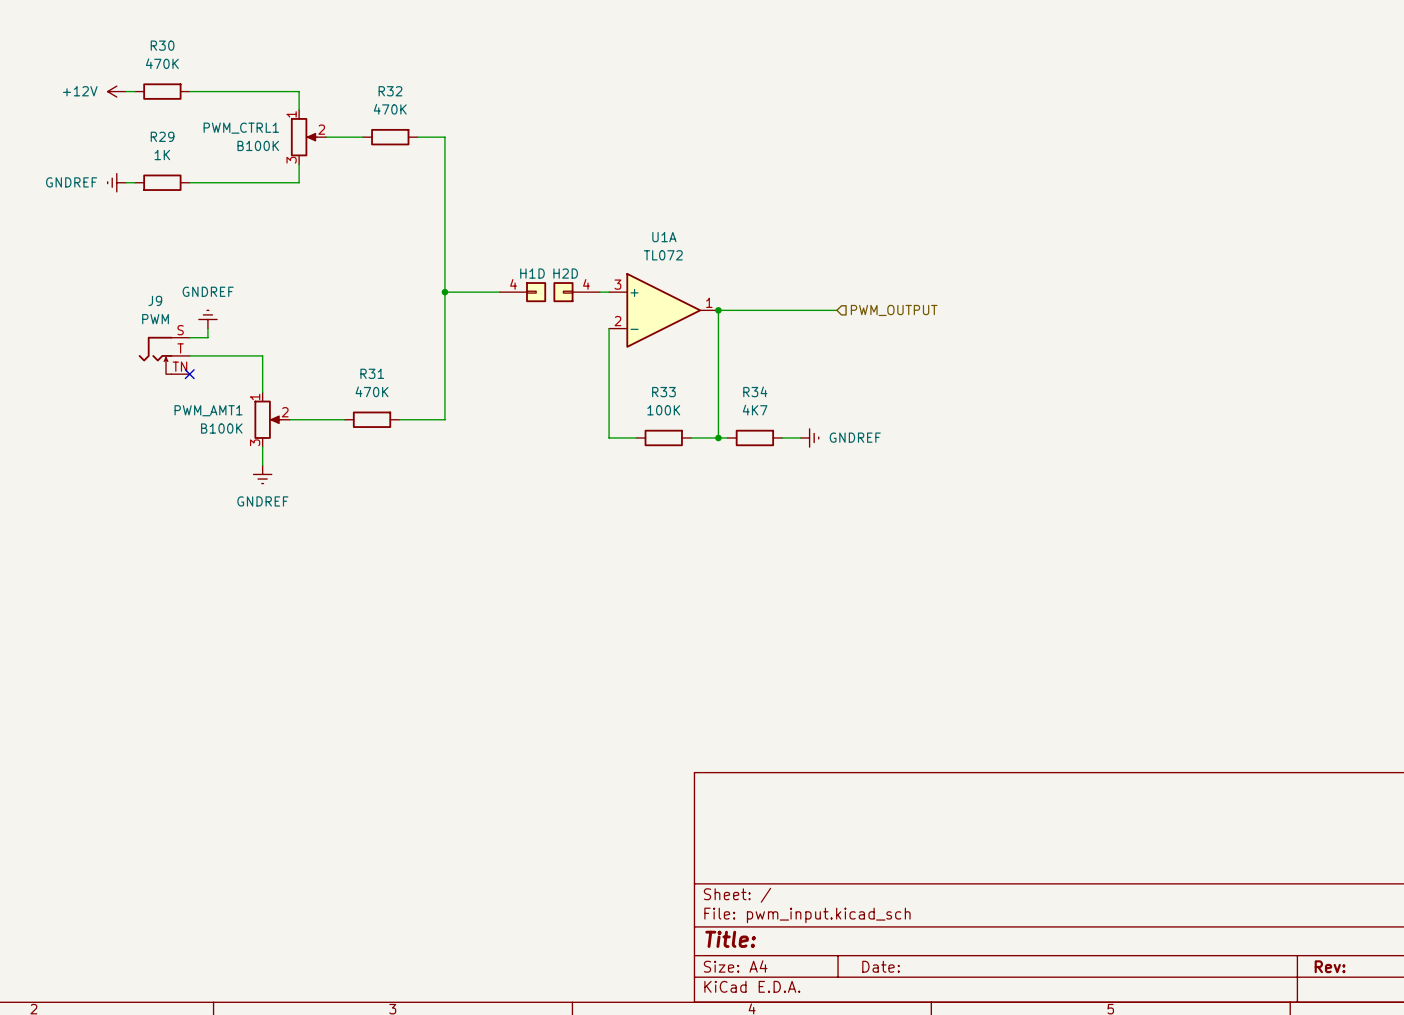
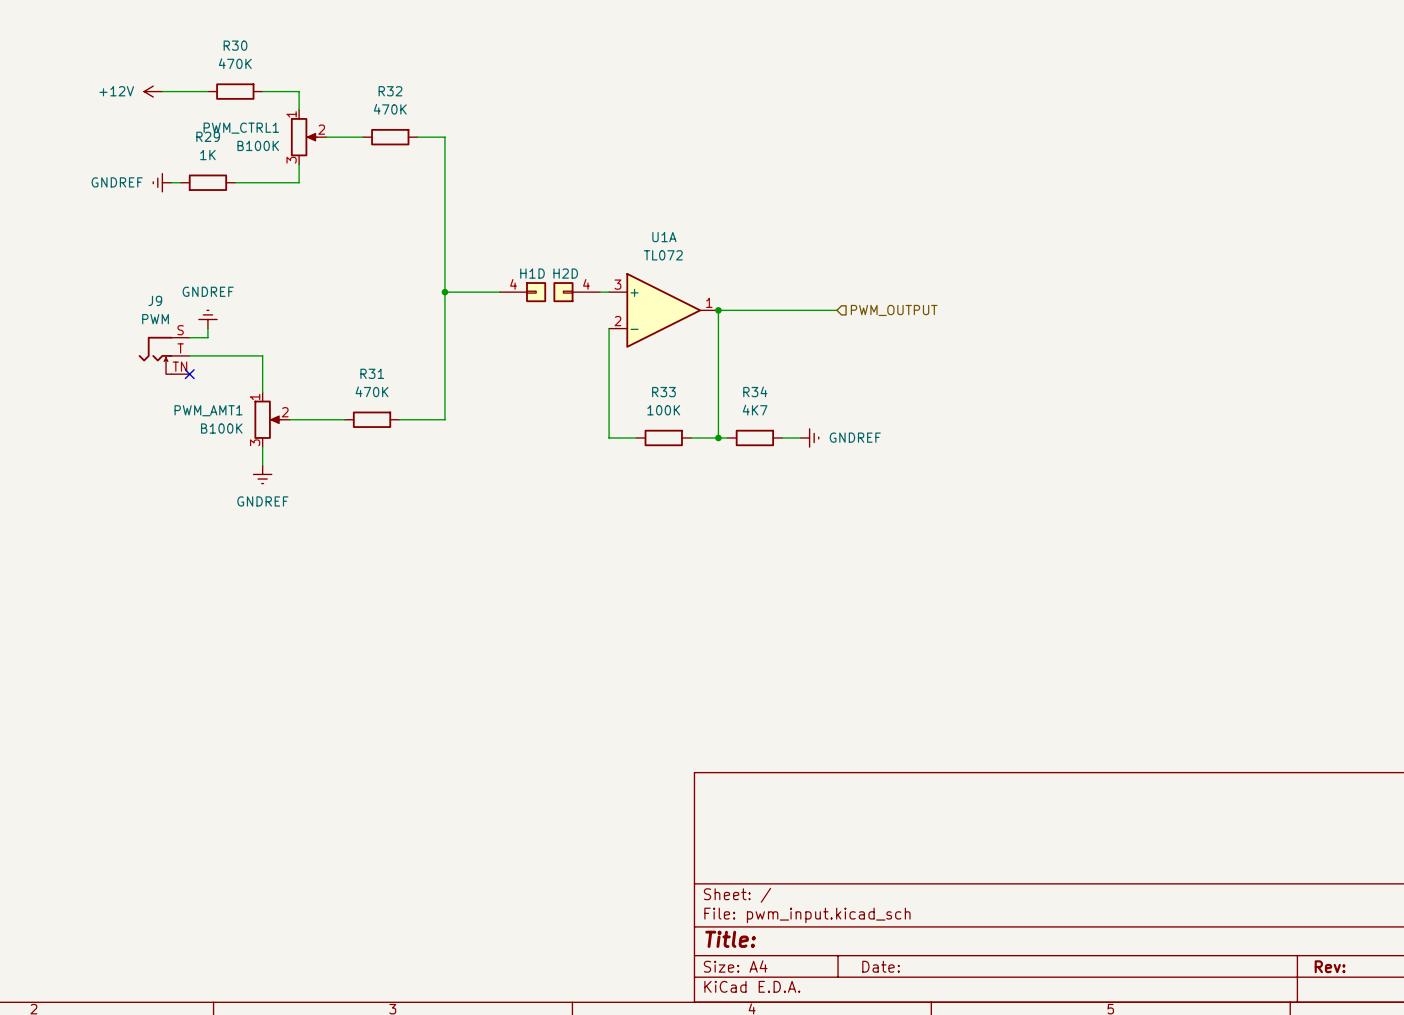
power symbol position: +12V (116, 91) -> +12V (153, 91)
wire: (125, 91) (135, 91) -> none
wire: none -> (162, 91) (189, 91)
R30 position: (162, 91) -> (235, 91)
wire: (207, 91) (262, 91) -> none
power symbol position: GNDREF (116, 182) -> GNDREF (162, 182)
wire: (125, 182) (135, 182) -> (171, 182) (180, 182)
R29 position: (162, 182) -> (207, 182)
wire: (189, 182) (235, 182) -> none

